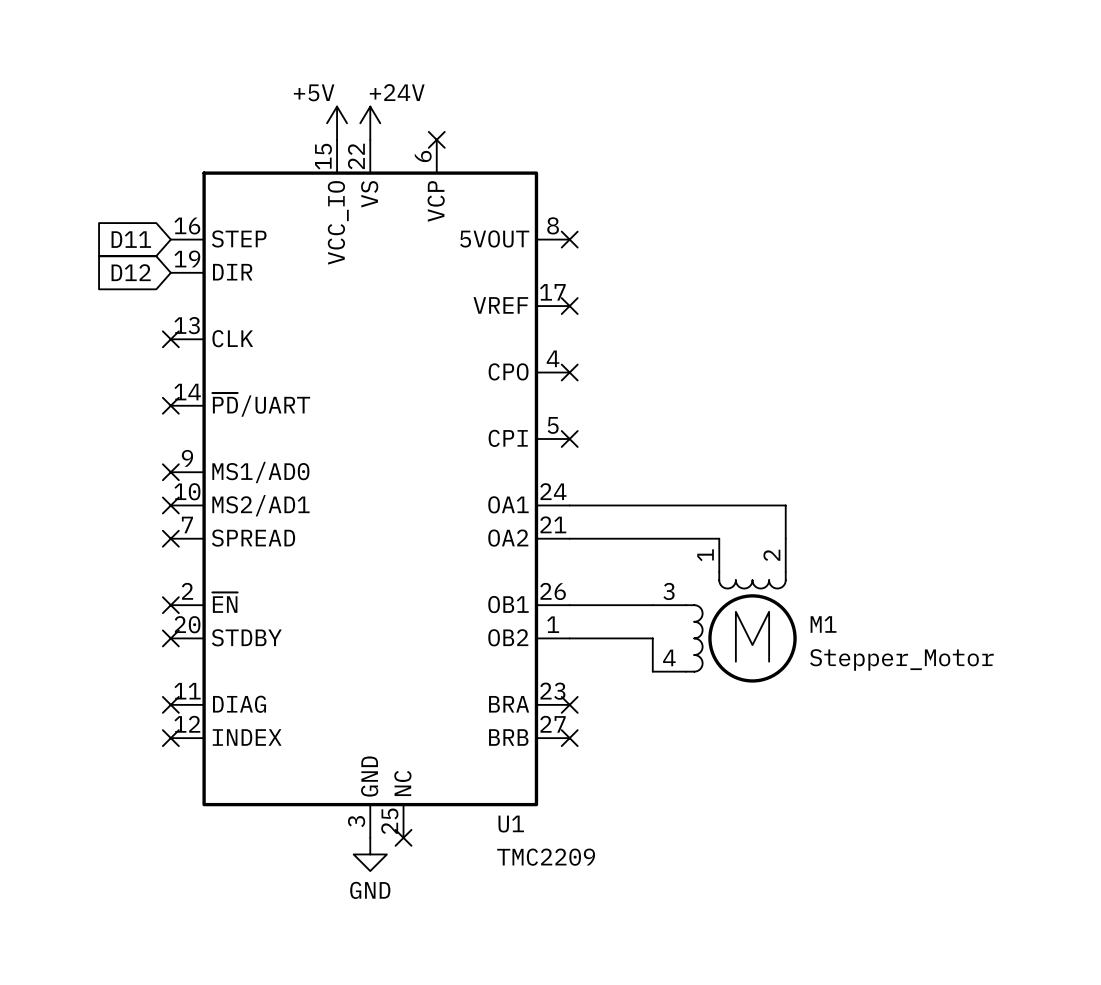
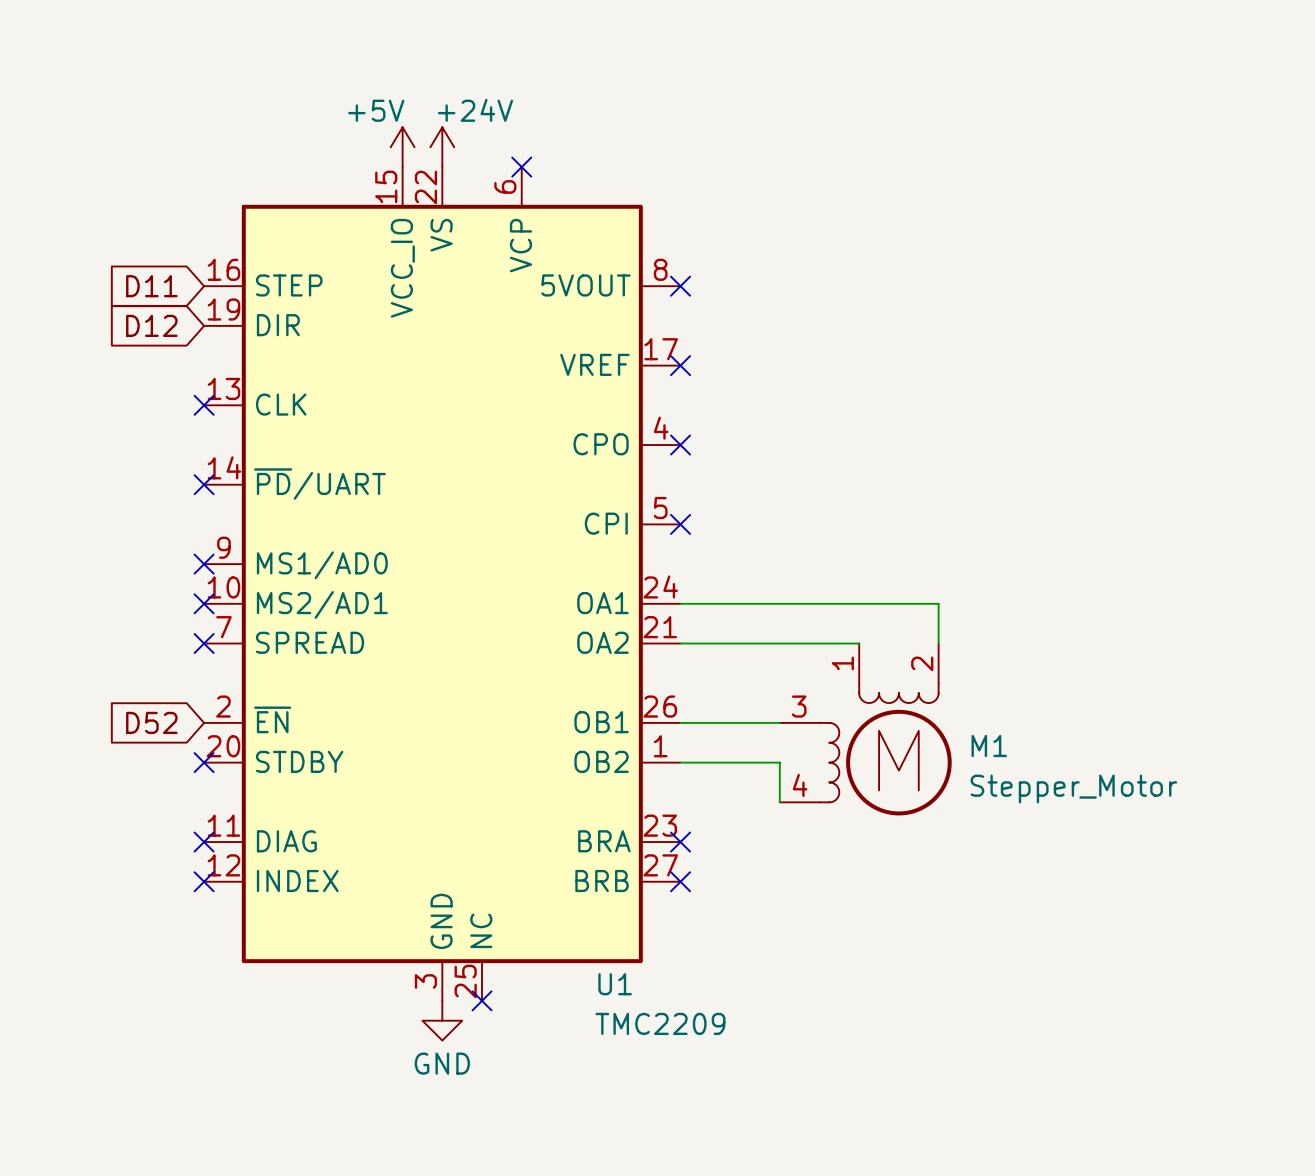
global label: none -> D52 (151, 722)
no-connect mark: (170, 605) -> none

